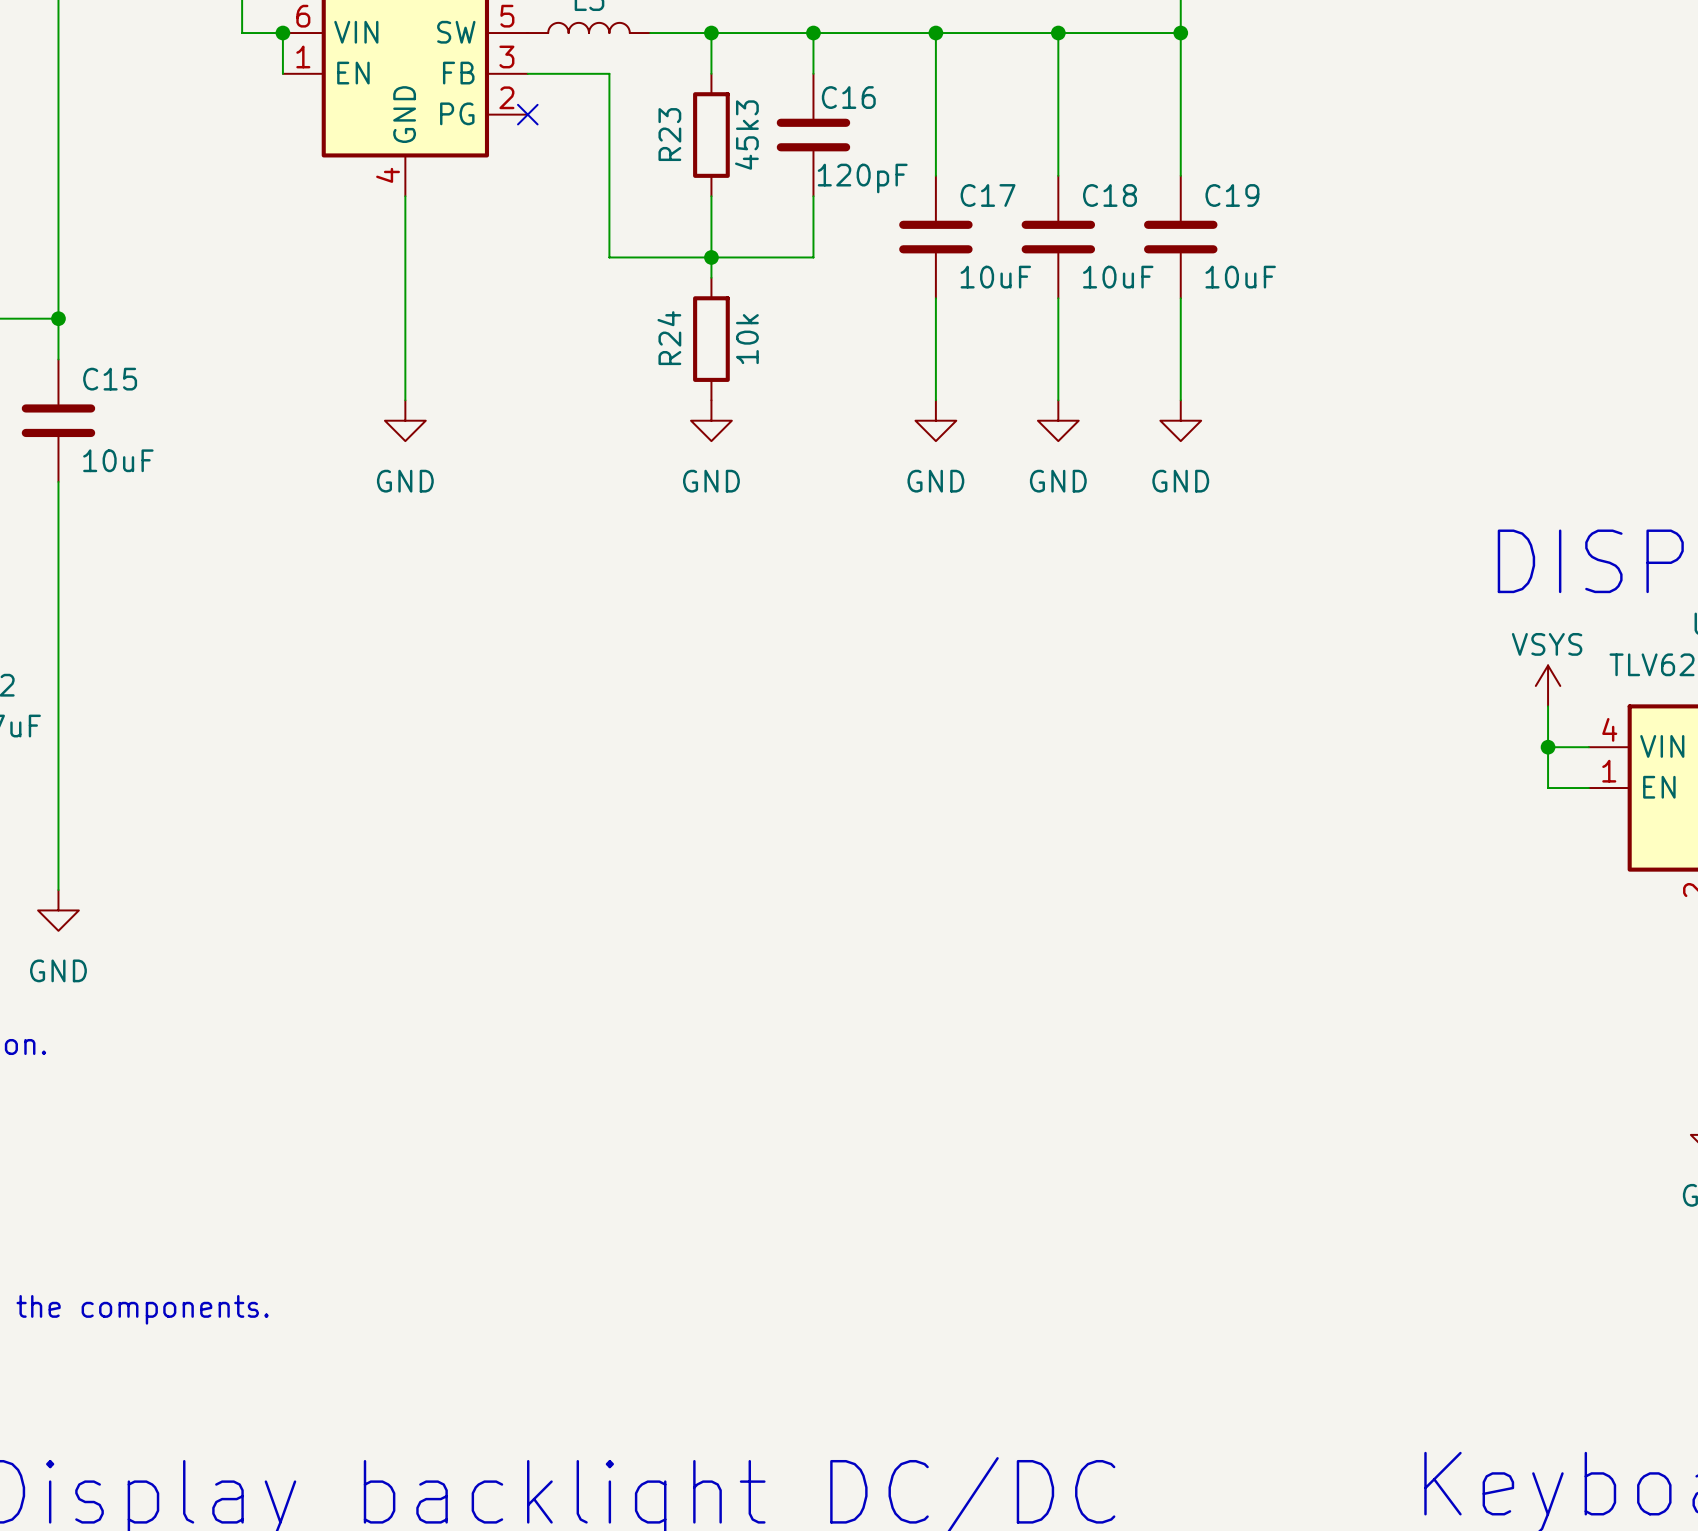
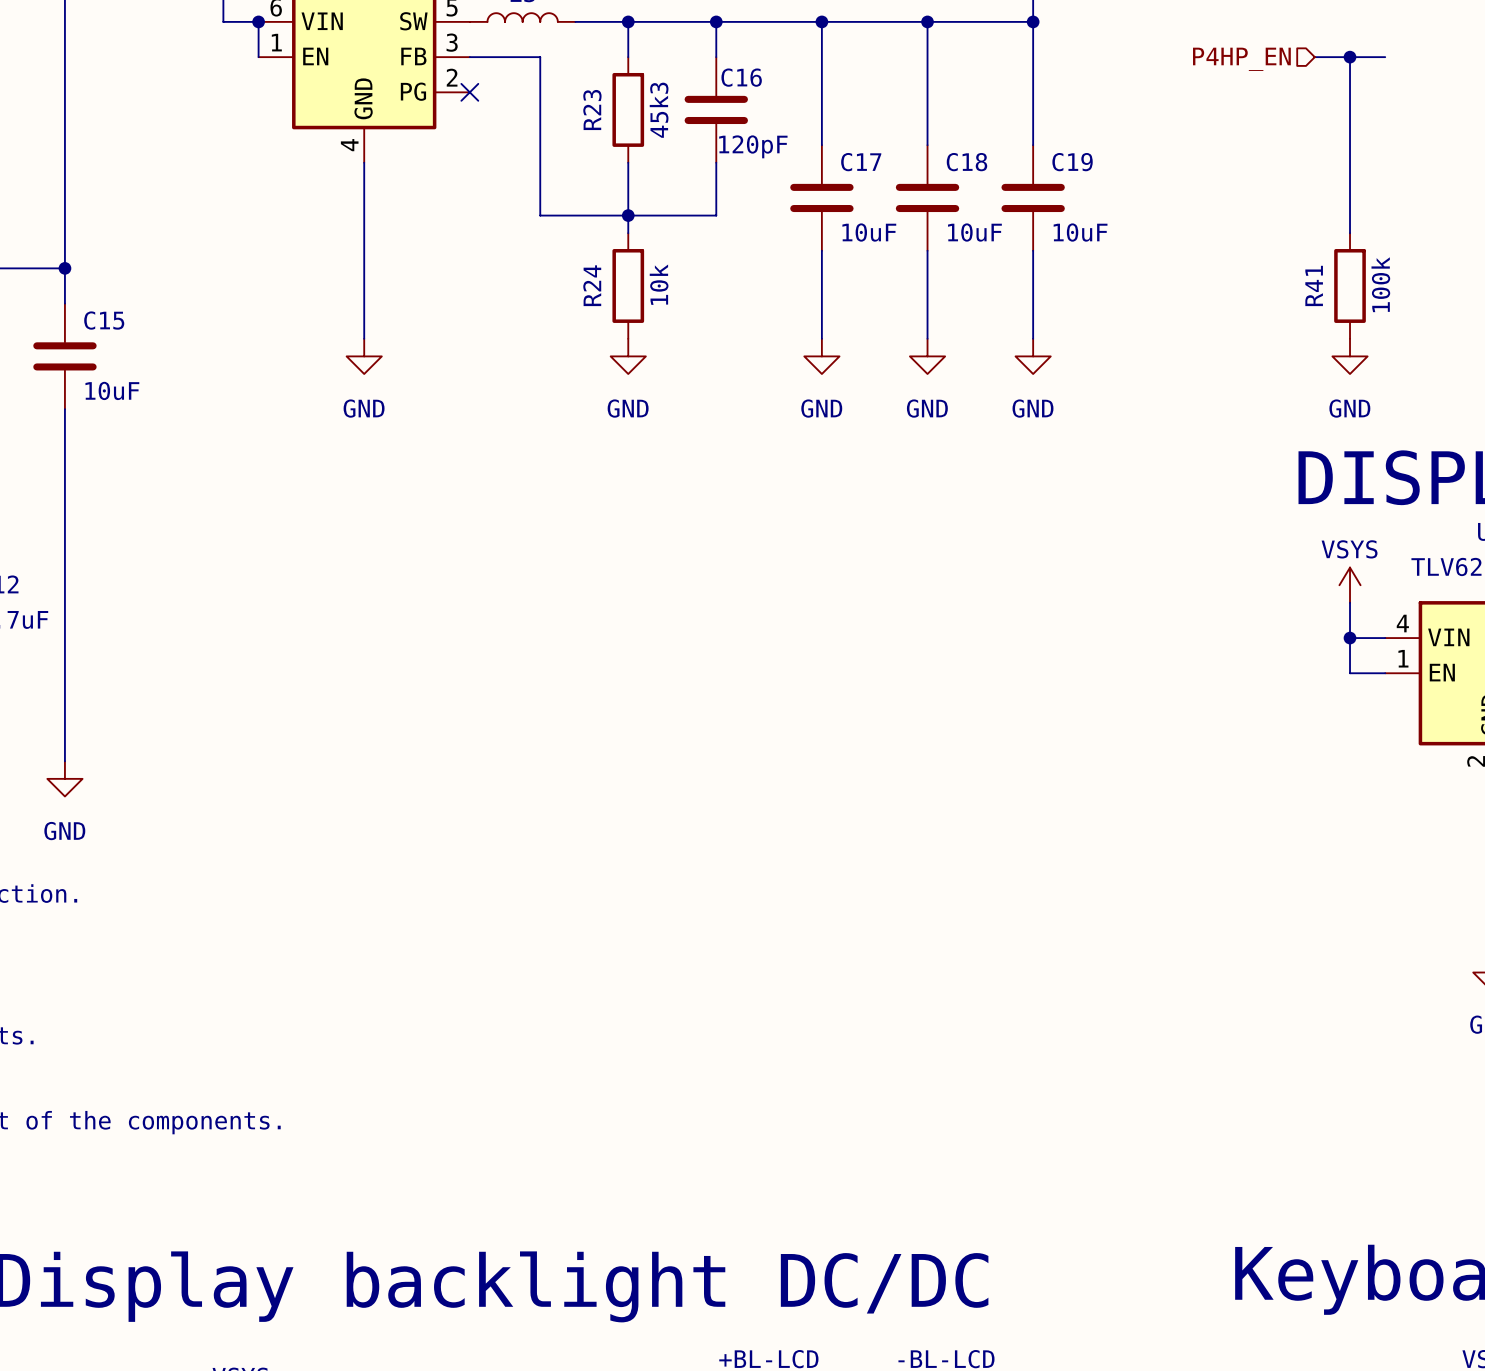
hierarchical label: none -> P4HP_EN (1241, 59)
wire: none -> (1314, 57) (1385, 57)
wire: none -> (1350, 57) (1350, 233)
junction: none -> (1350, 57)
R41: none -> 100k (1350, 285)
power symbol: none -> GND (1350, 356)

